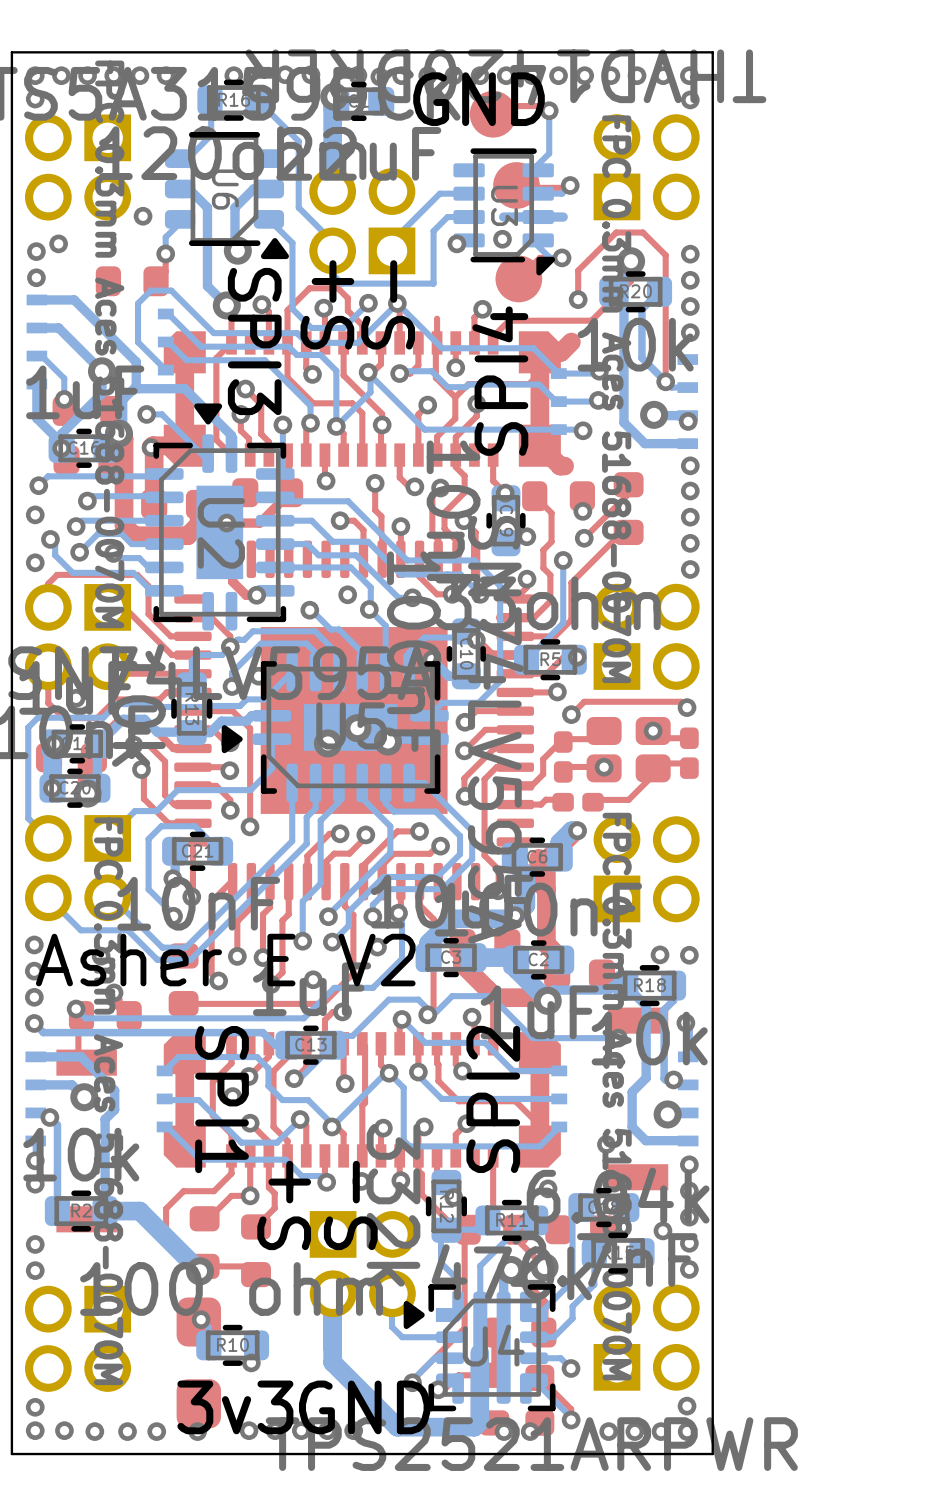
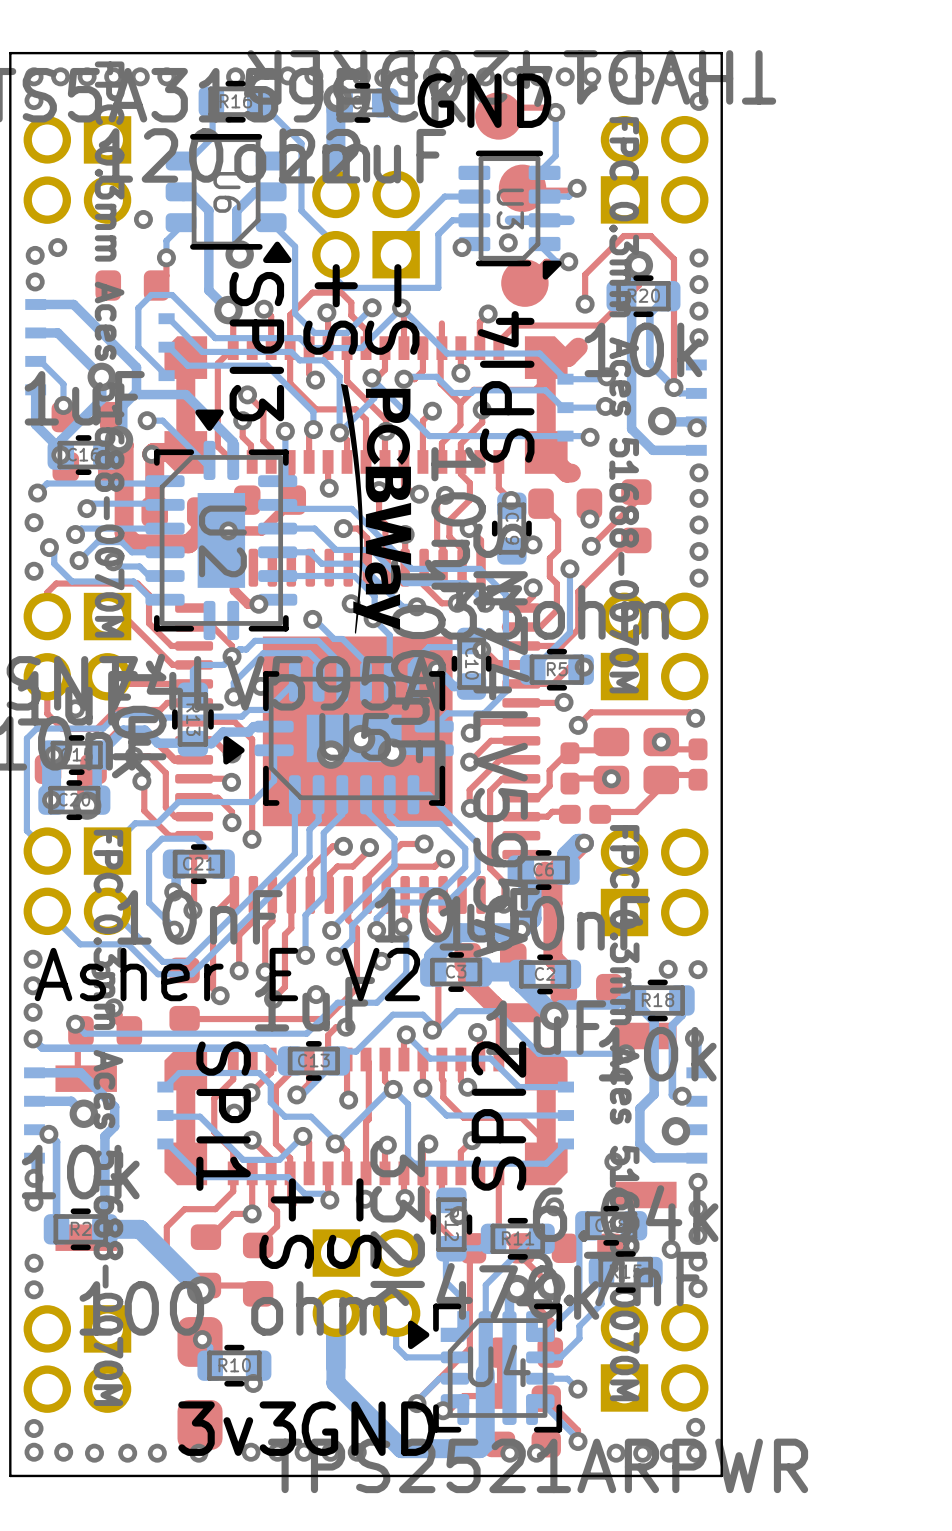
drawing: none -> [340, 383, 412, 635]

